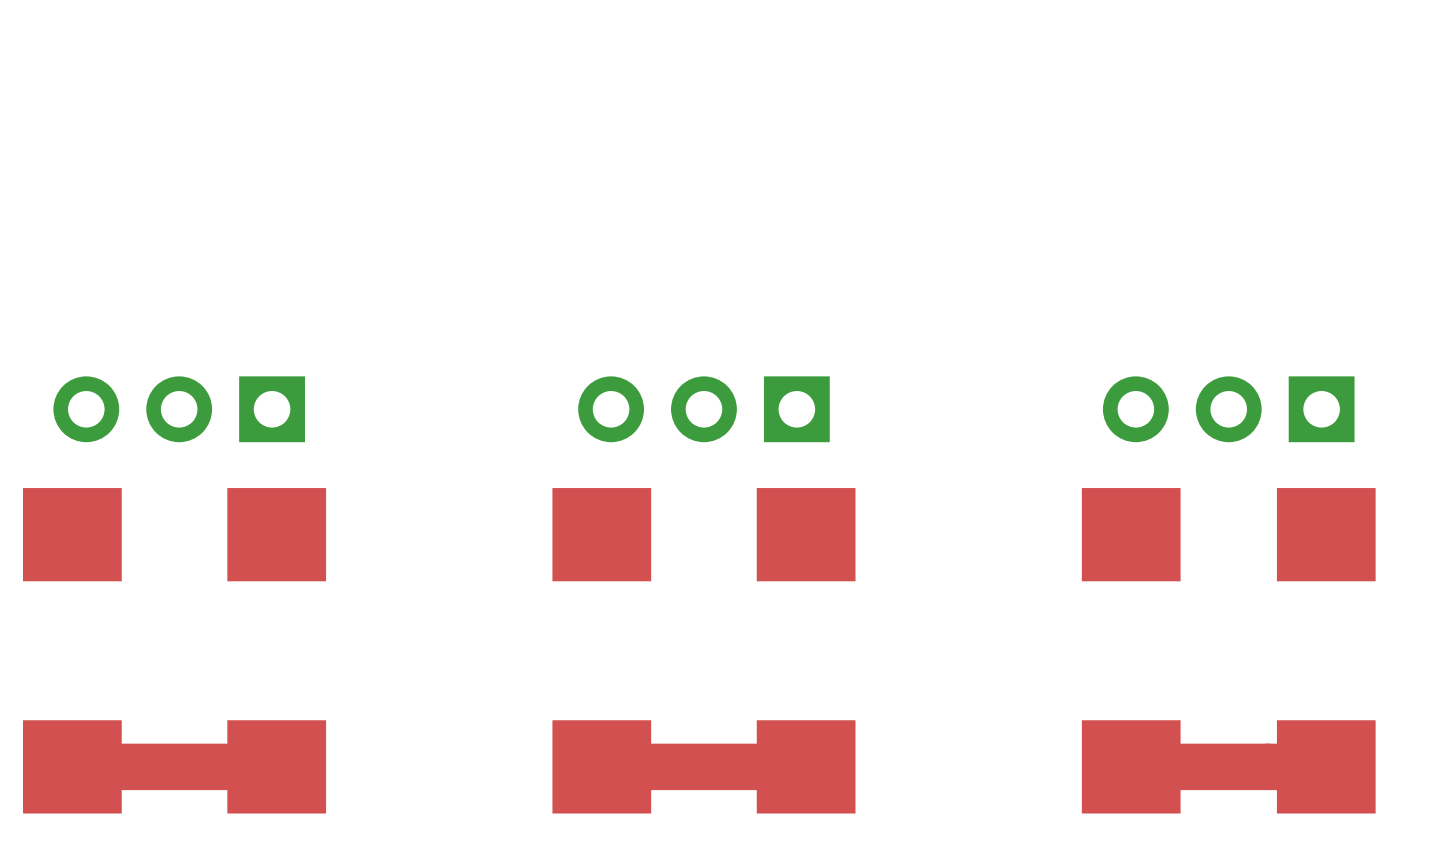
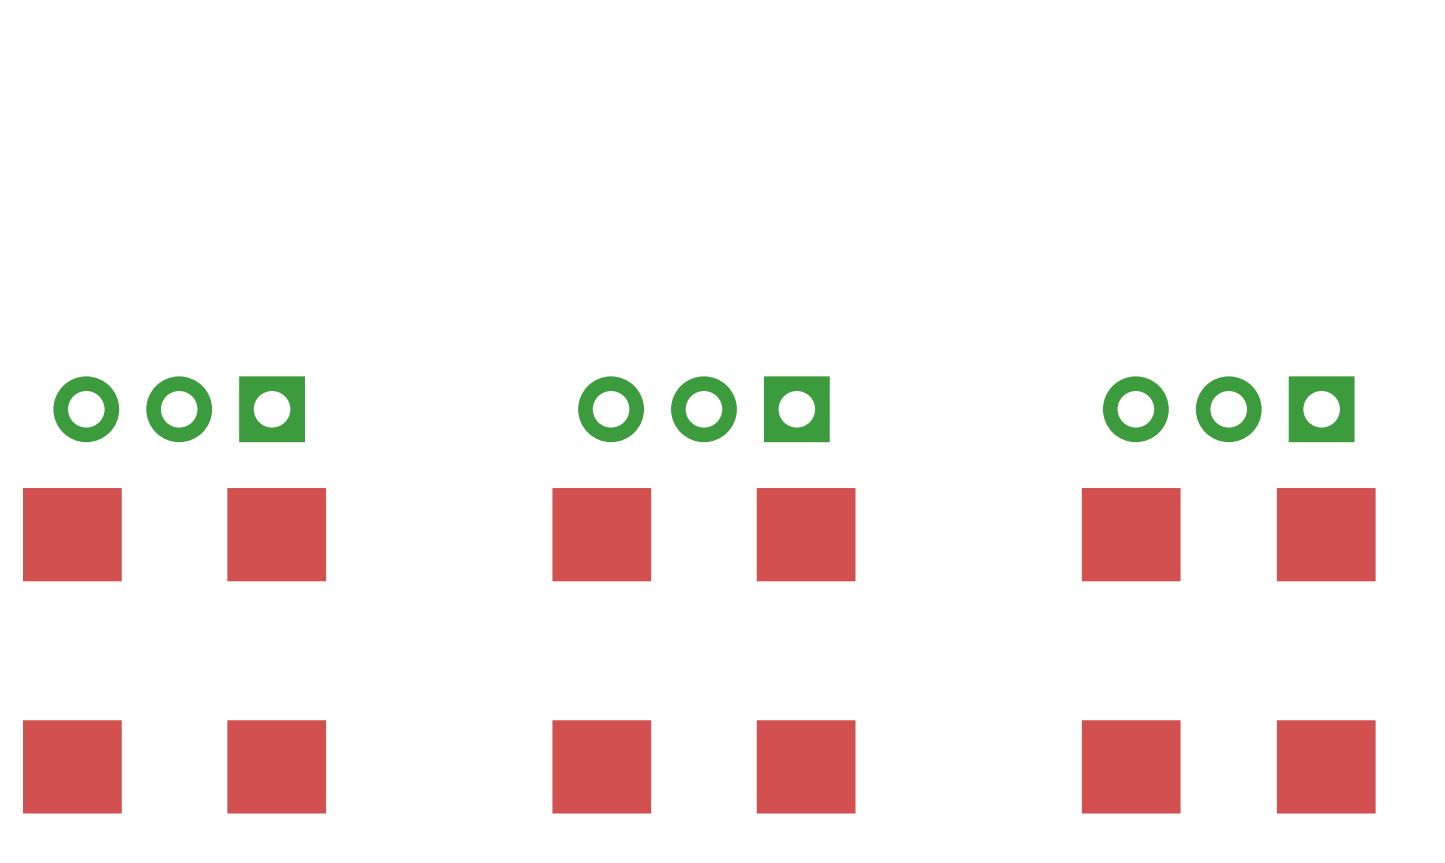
top track: (276, 766) (72, 766) -> none
top track: (806, 766) (601, 766) -> none
top track: (1326, 766) (1131, 766) -> none

